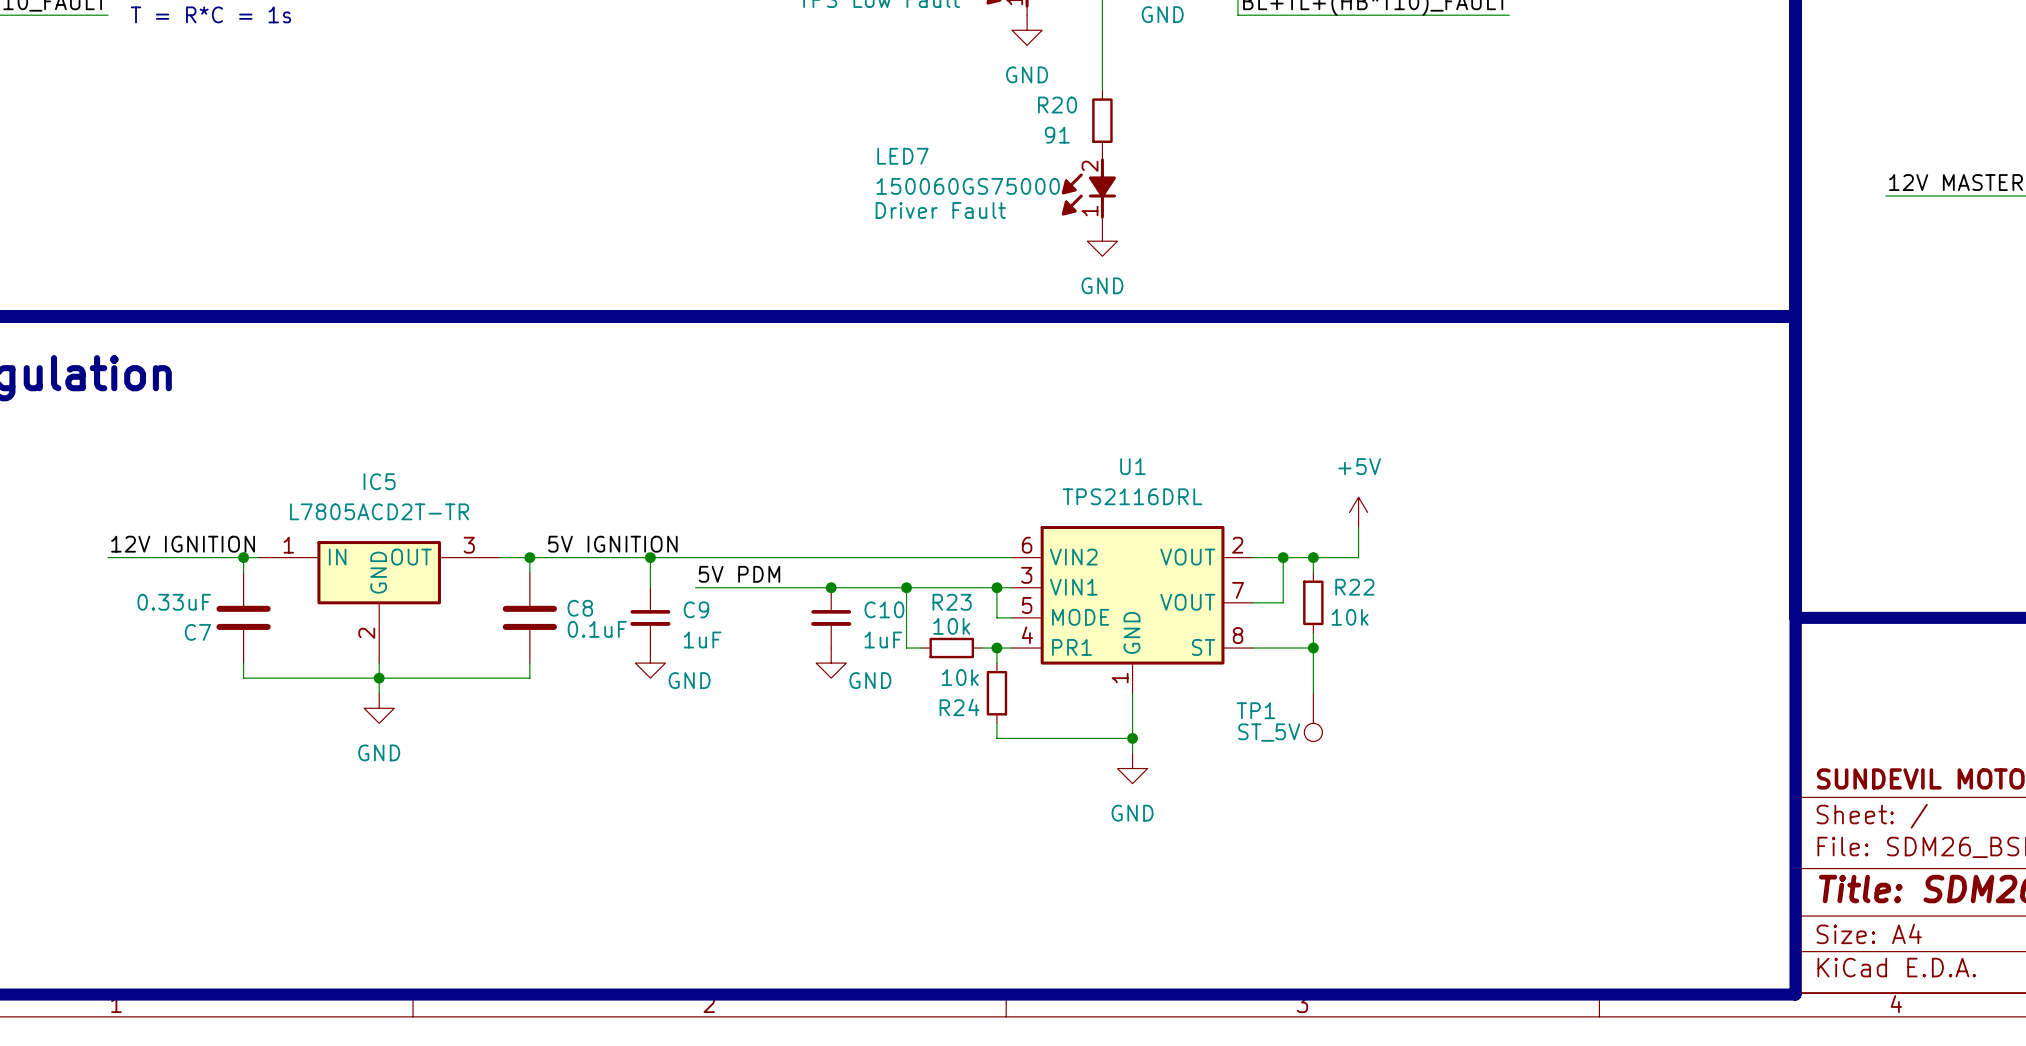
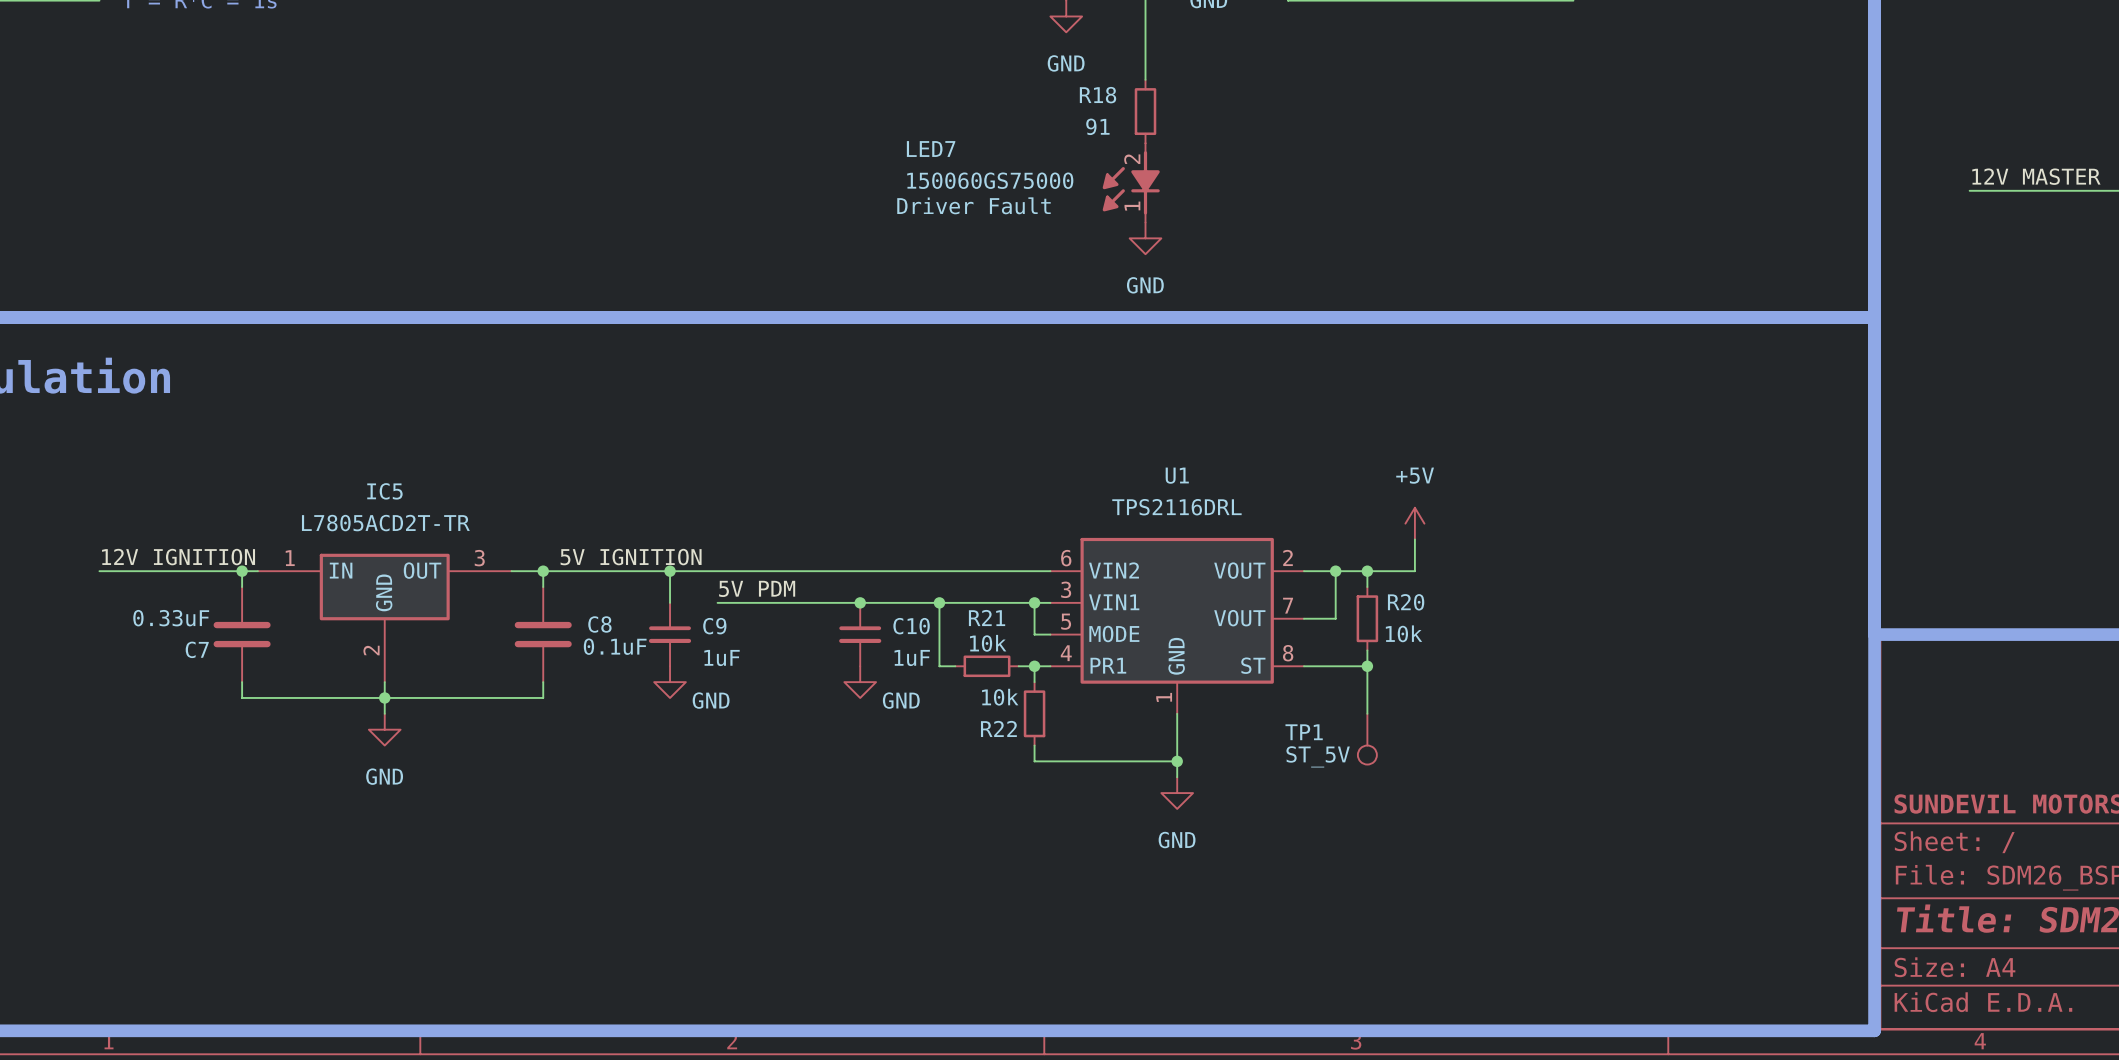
R20 name: R20 (1057, 105) -> R18 (1098, 95)
R22 name: R22 (1354, 587) -> R20 (1406, 602)
R23 name: R23 (952, 602) -> R21 (987, 618)
R24 name: R24 (959, 707) -> R22 (998, 728)

